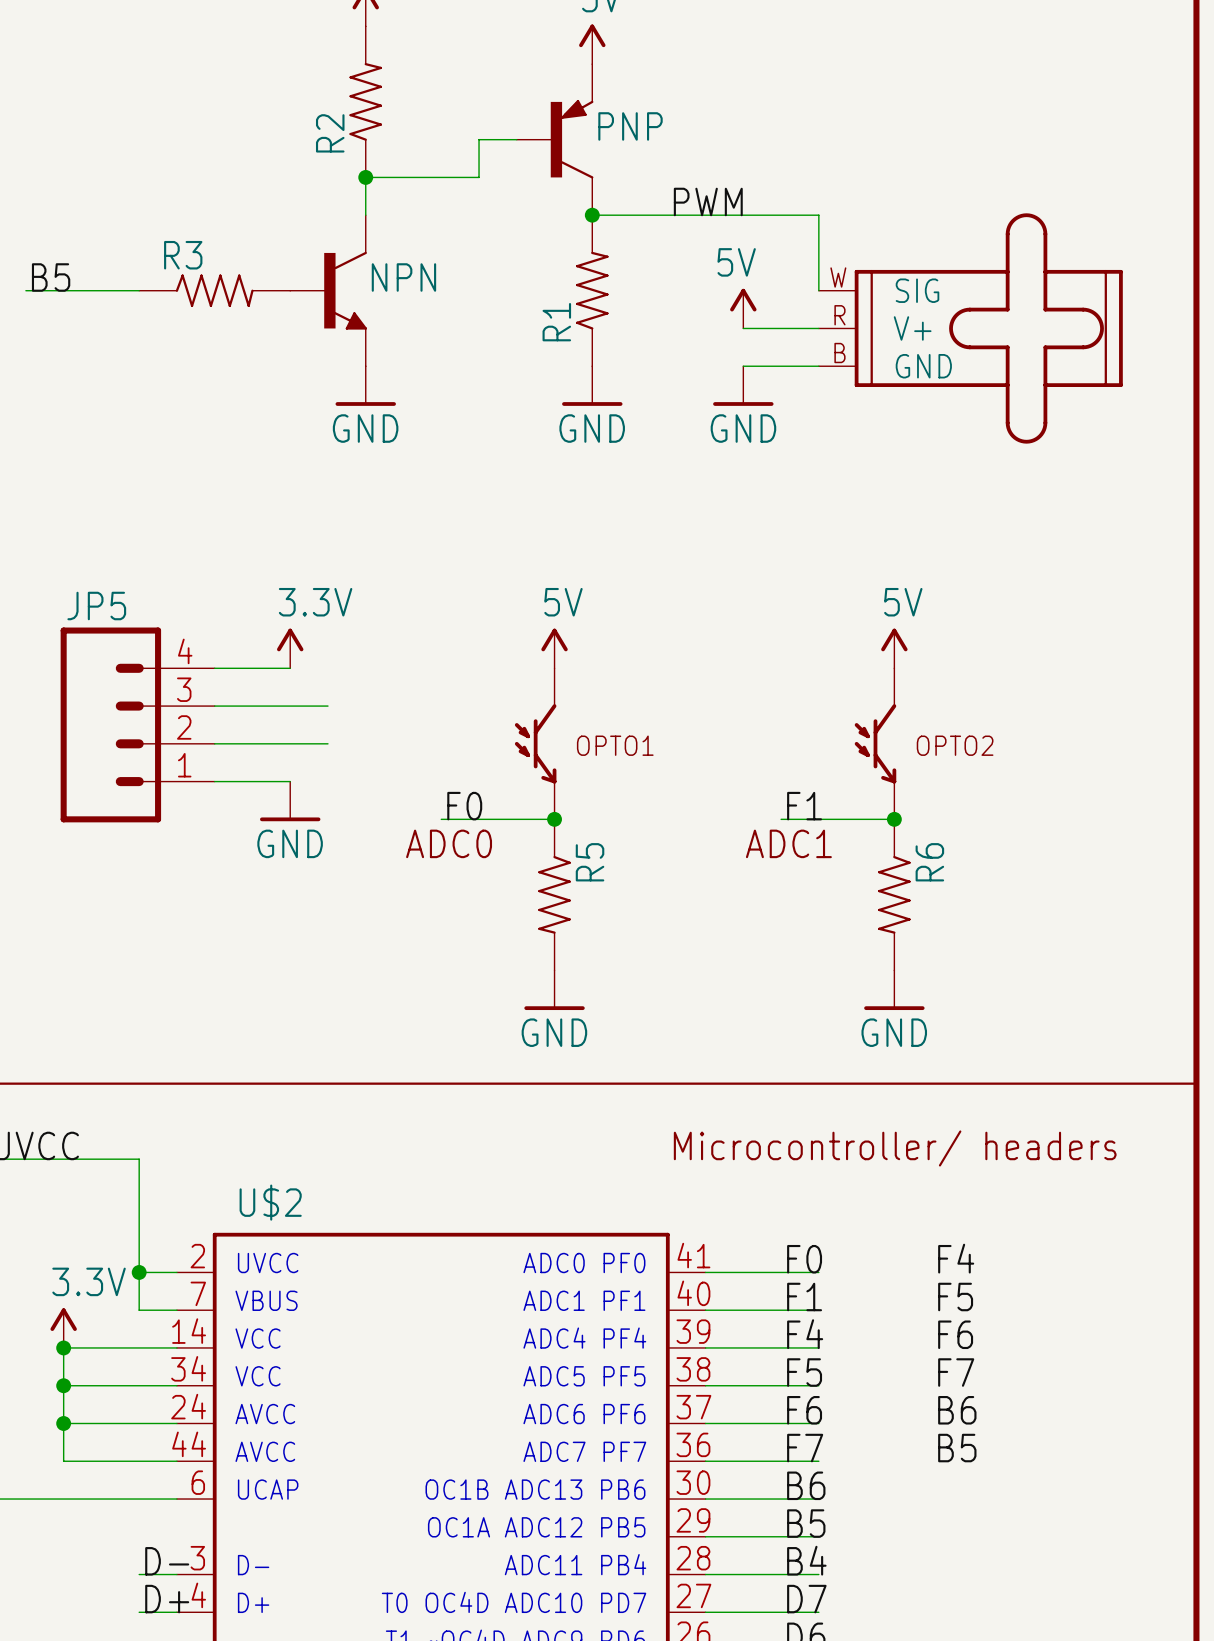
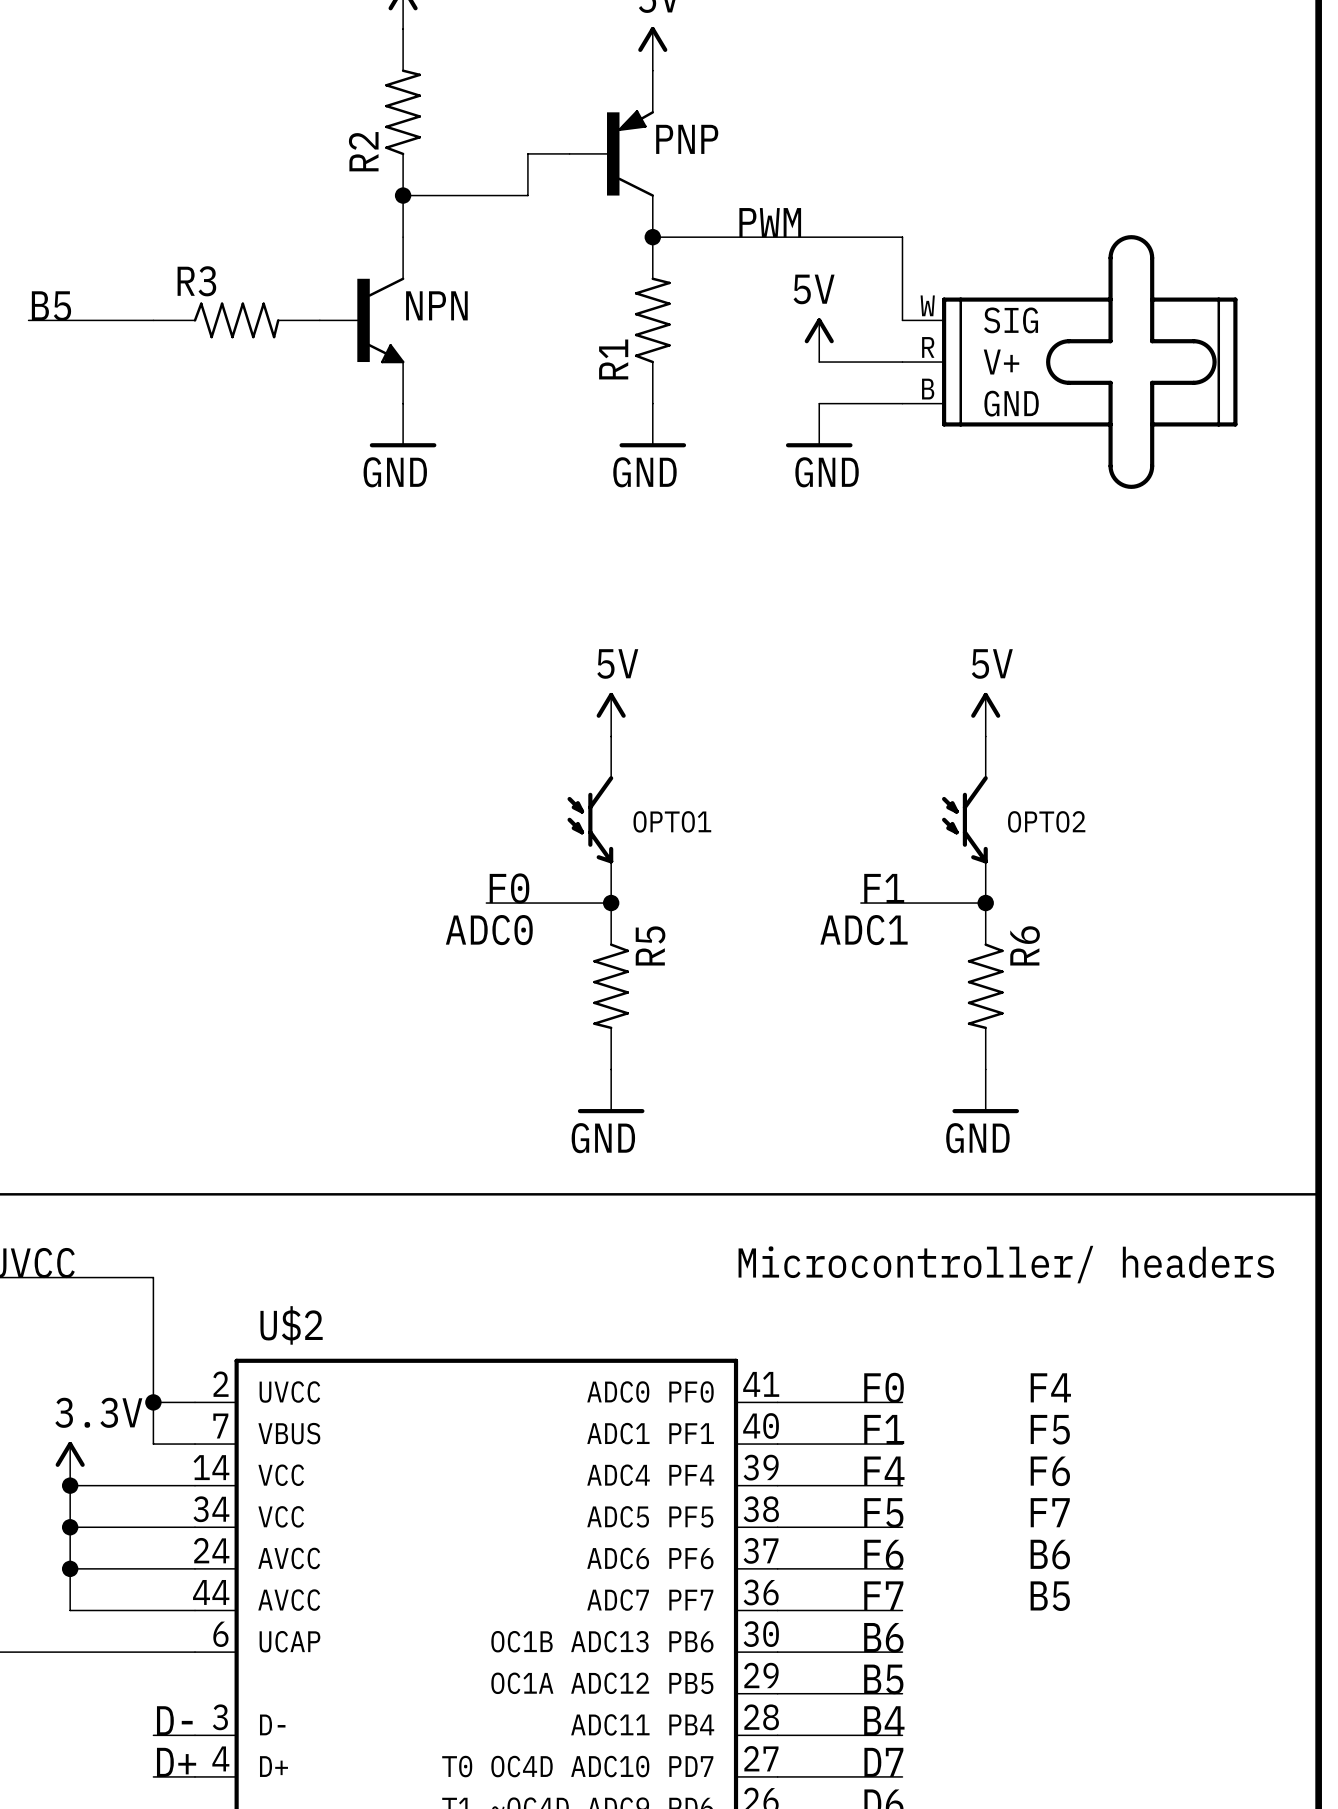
power symbol: 3.3V (290, 648) -> none
wire: (214, 668) (290, 668) -> none
wire: (214, 706) (327, 706) -> none
JP5: (137, 724) -> none
wire: (214, 743) (327, 743) -> none
wire: (214, 781) (290, 781) -> none
power symbol: GND (290, 801) -> none

